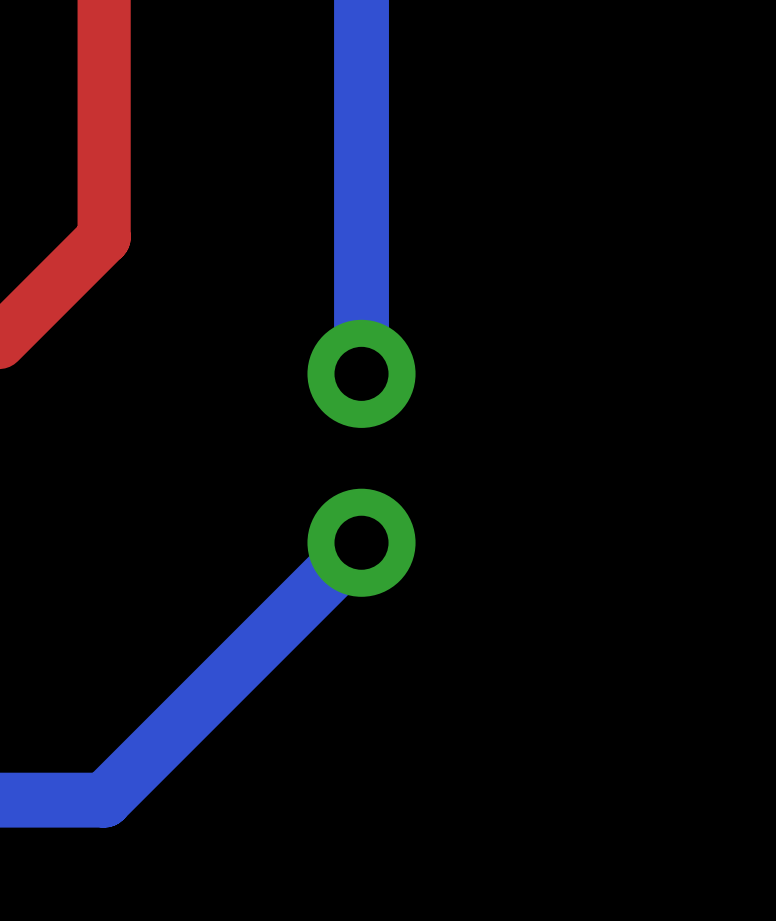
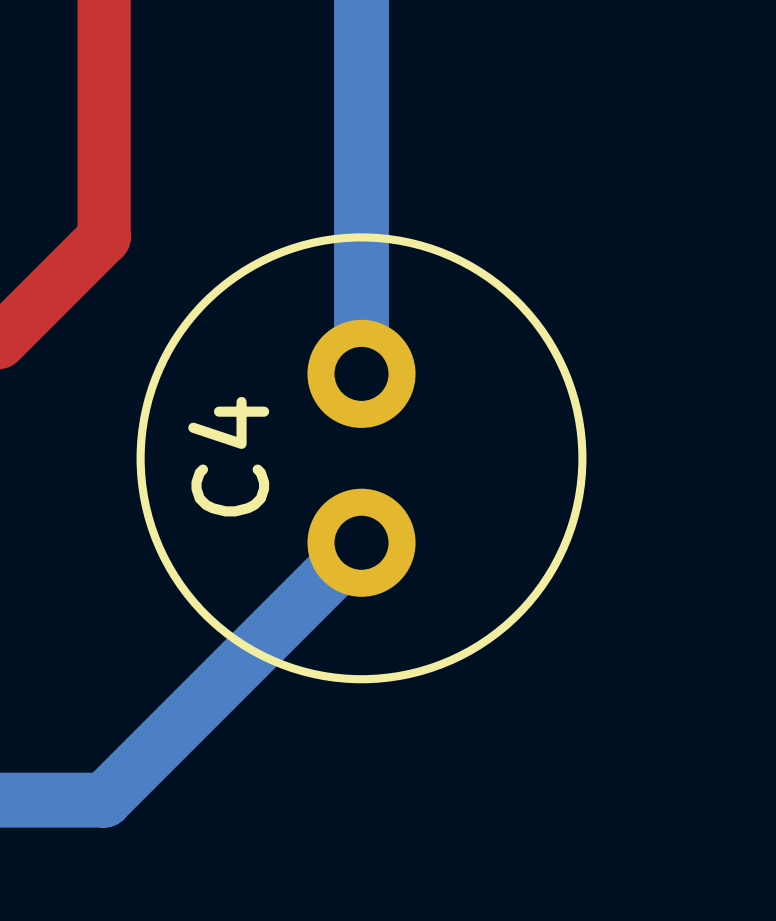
C4 side: bottom (361, 458) -> top (361, 458)

